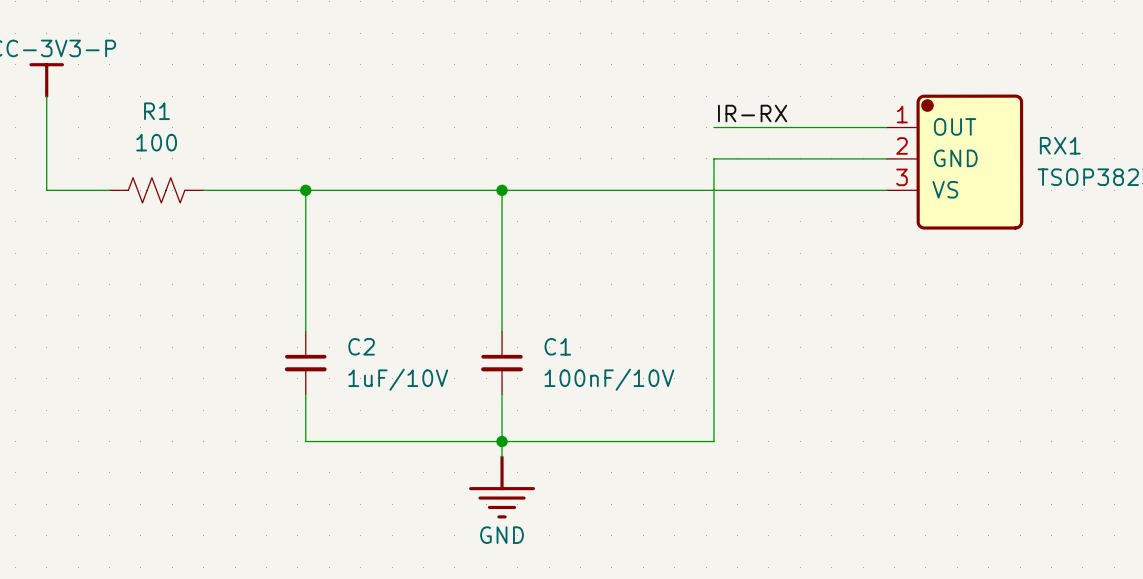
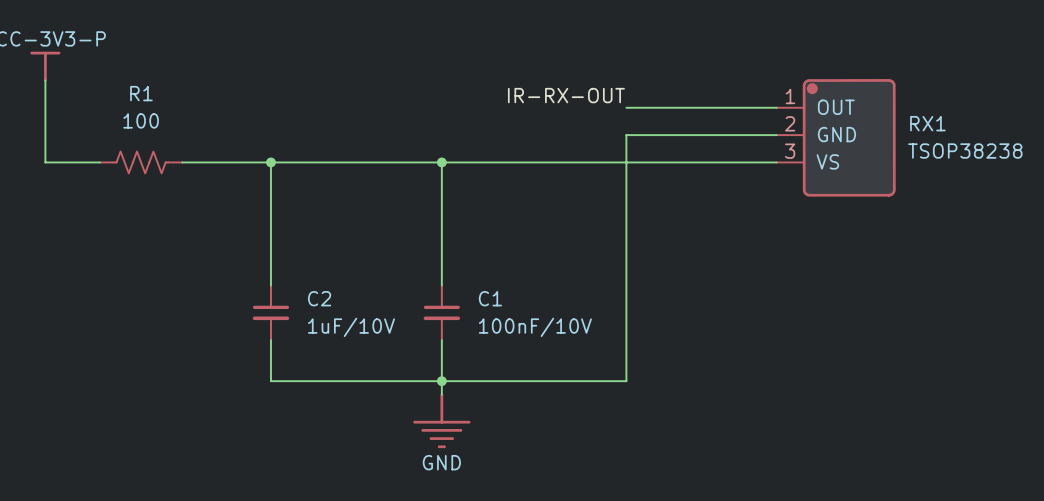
label: IR-RX (752, 113) -> IR-RX-OUT (566, 95)

